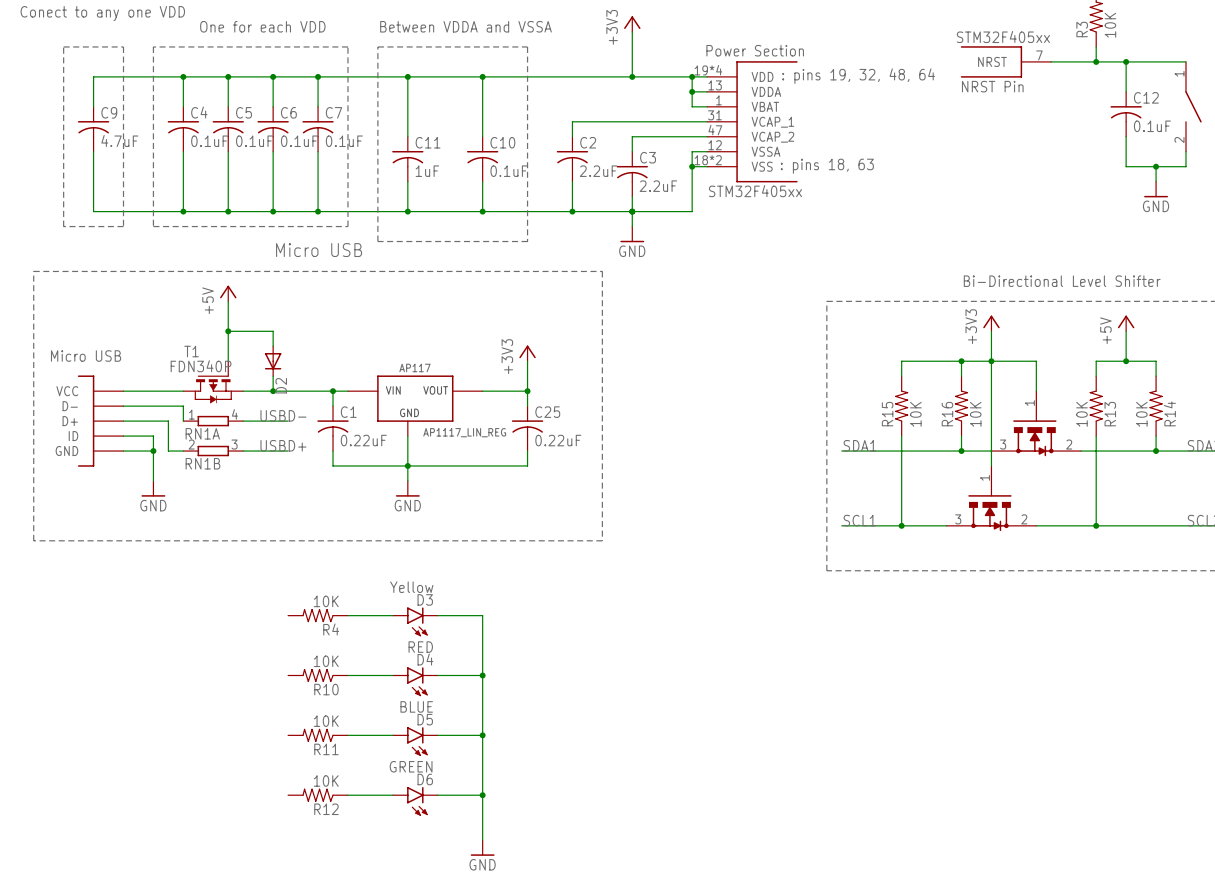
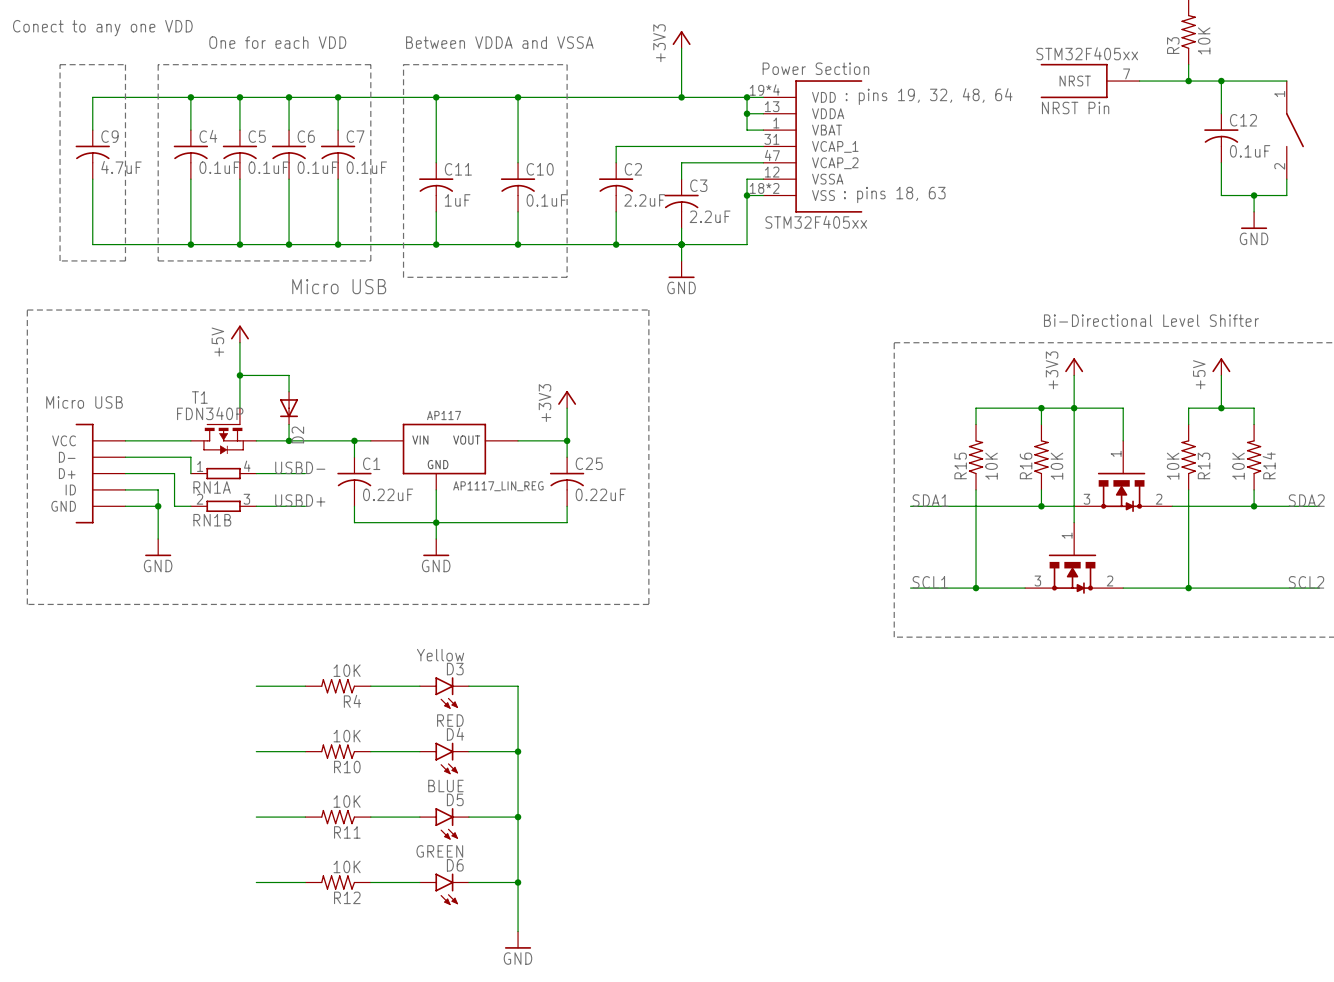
wire: none -> (256, 686) (305, 686)
wire: none -> (256, 751) (305, 751)
wire: none -> (256, 817) (305, 817)
wire: none -> (256, 882) (305, 882)

